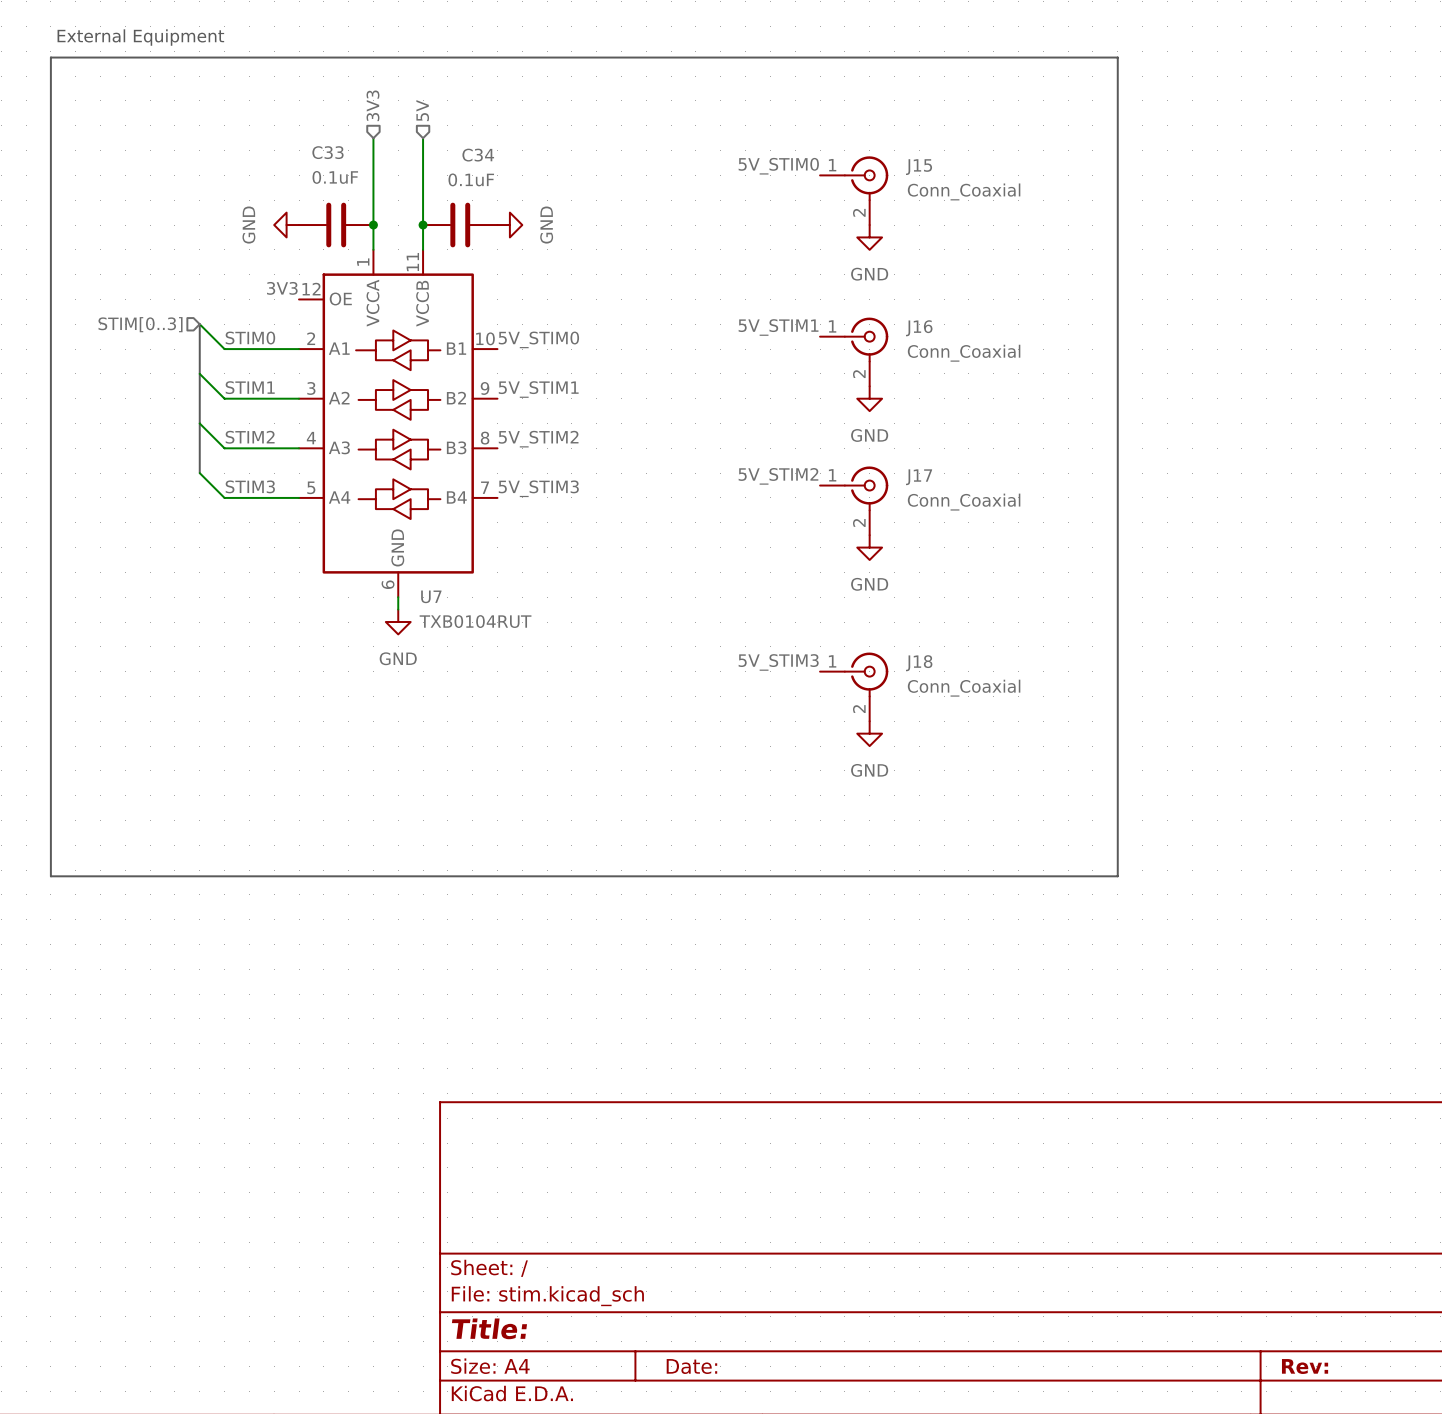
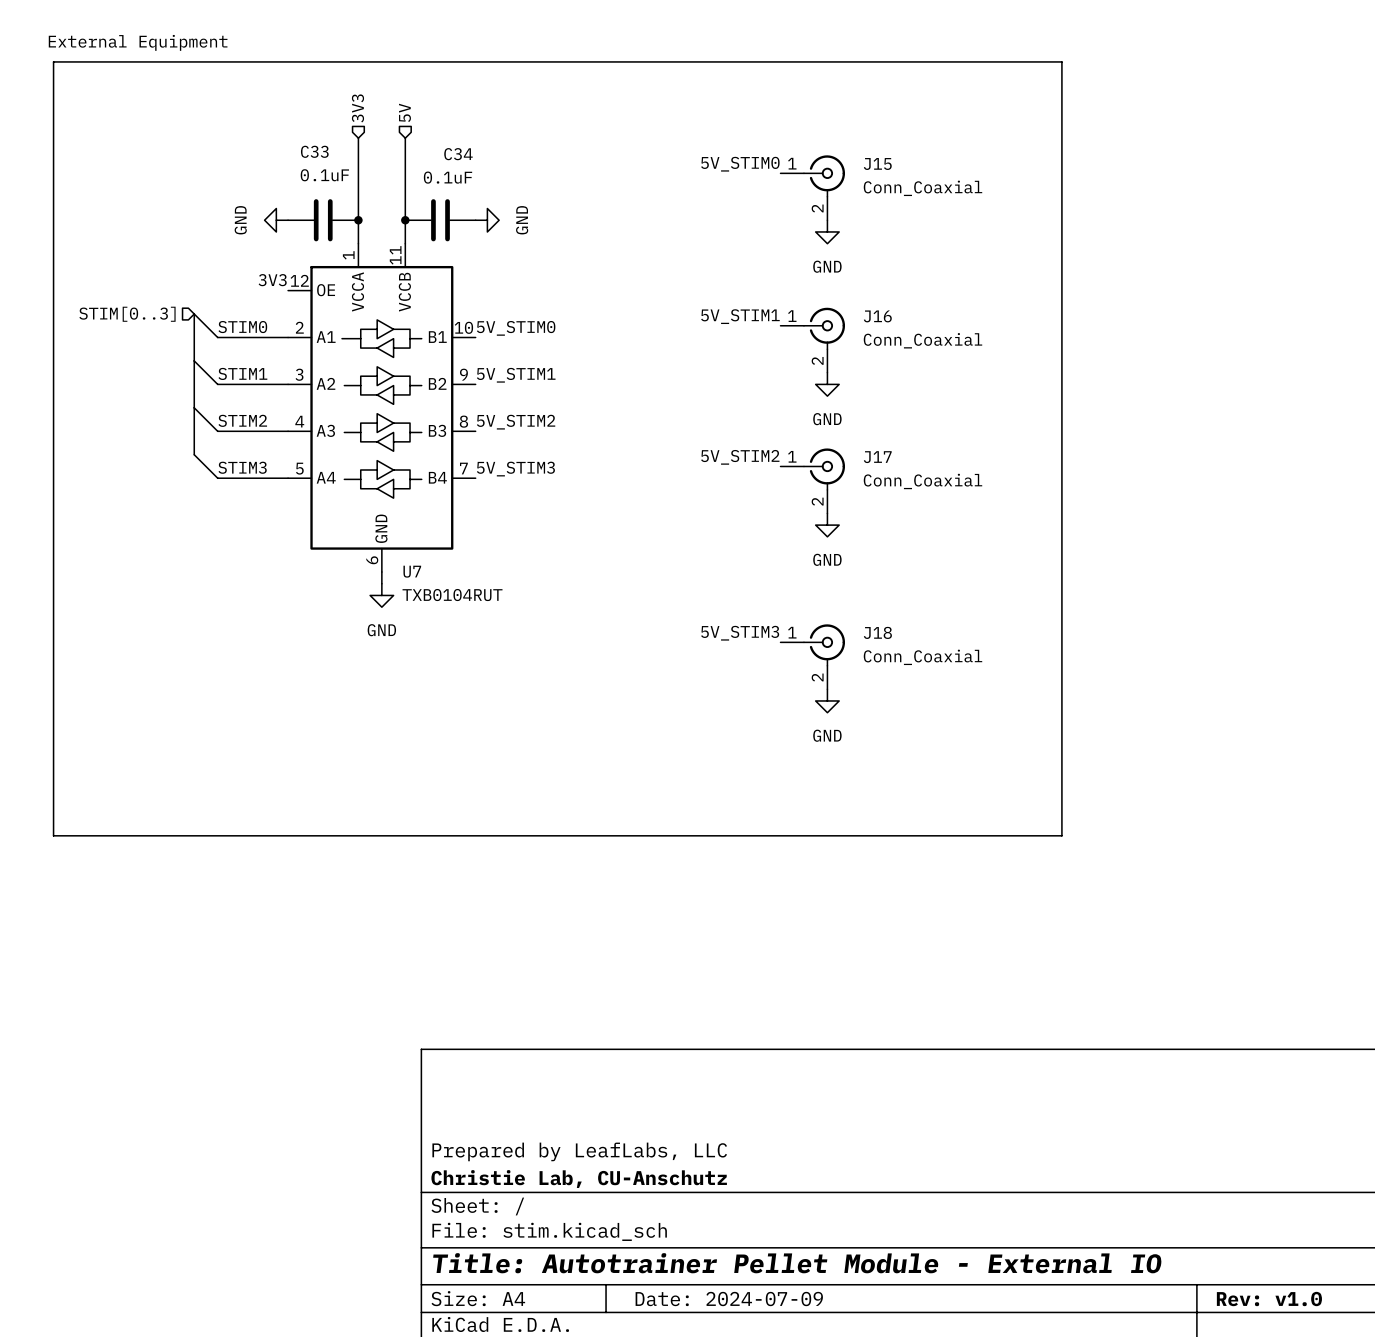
title block: none -> Prepared by LeafLabs, LLC (579, 1151)
title block: none -> Christie Lab, CU-Anschutz (579, 1179)
title block: Title: (489, 1328) -> Title: Autotrainer Pellet Module - External IO (797, 1263)
title block: Date: (691, 1366) -> Date: 2024-07-09 (729, 1299)
title block: Rev: (1305, 1366) -> Rev: v1.0 (1269, 1299)

